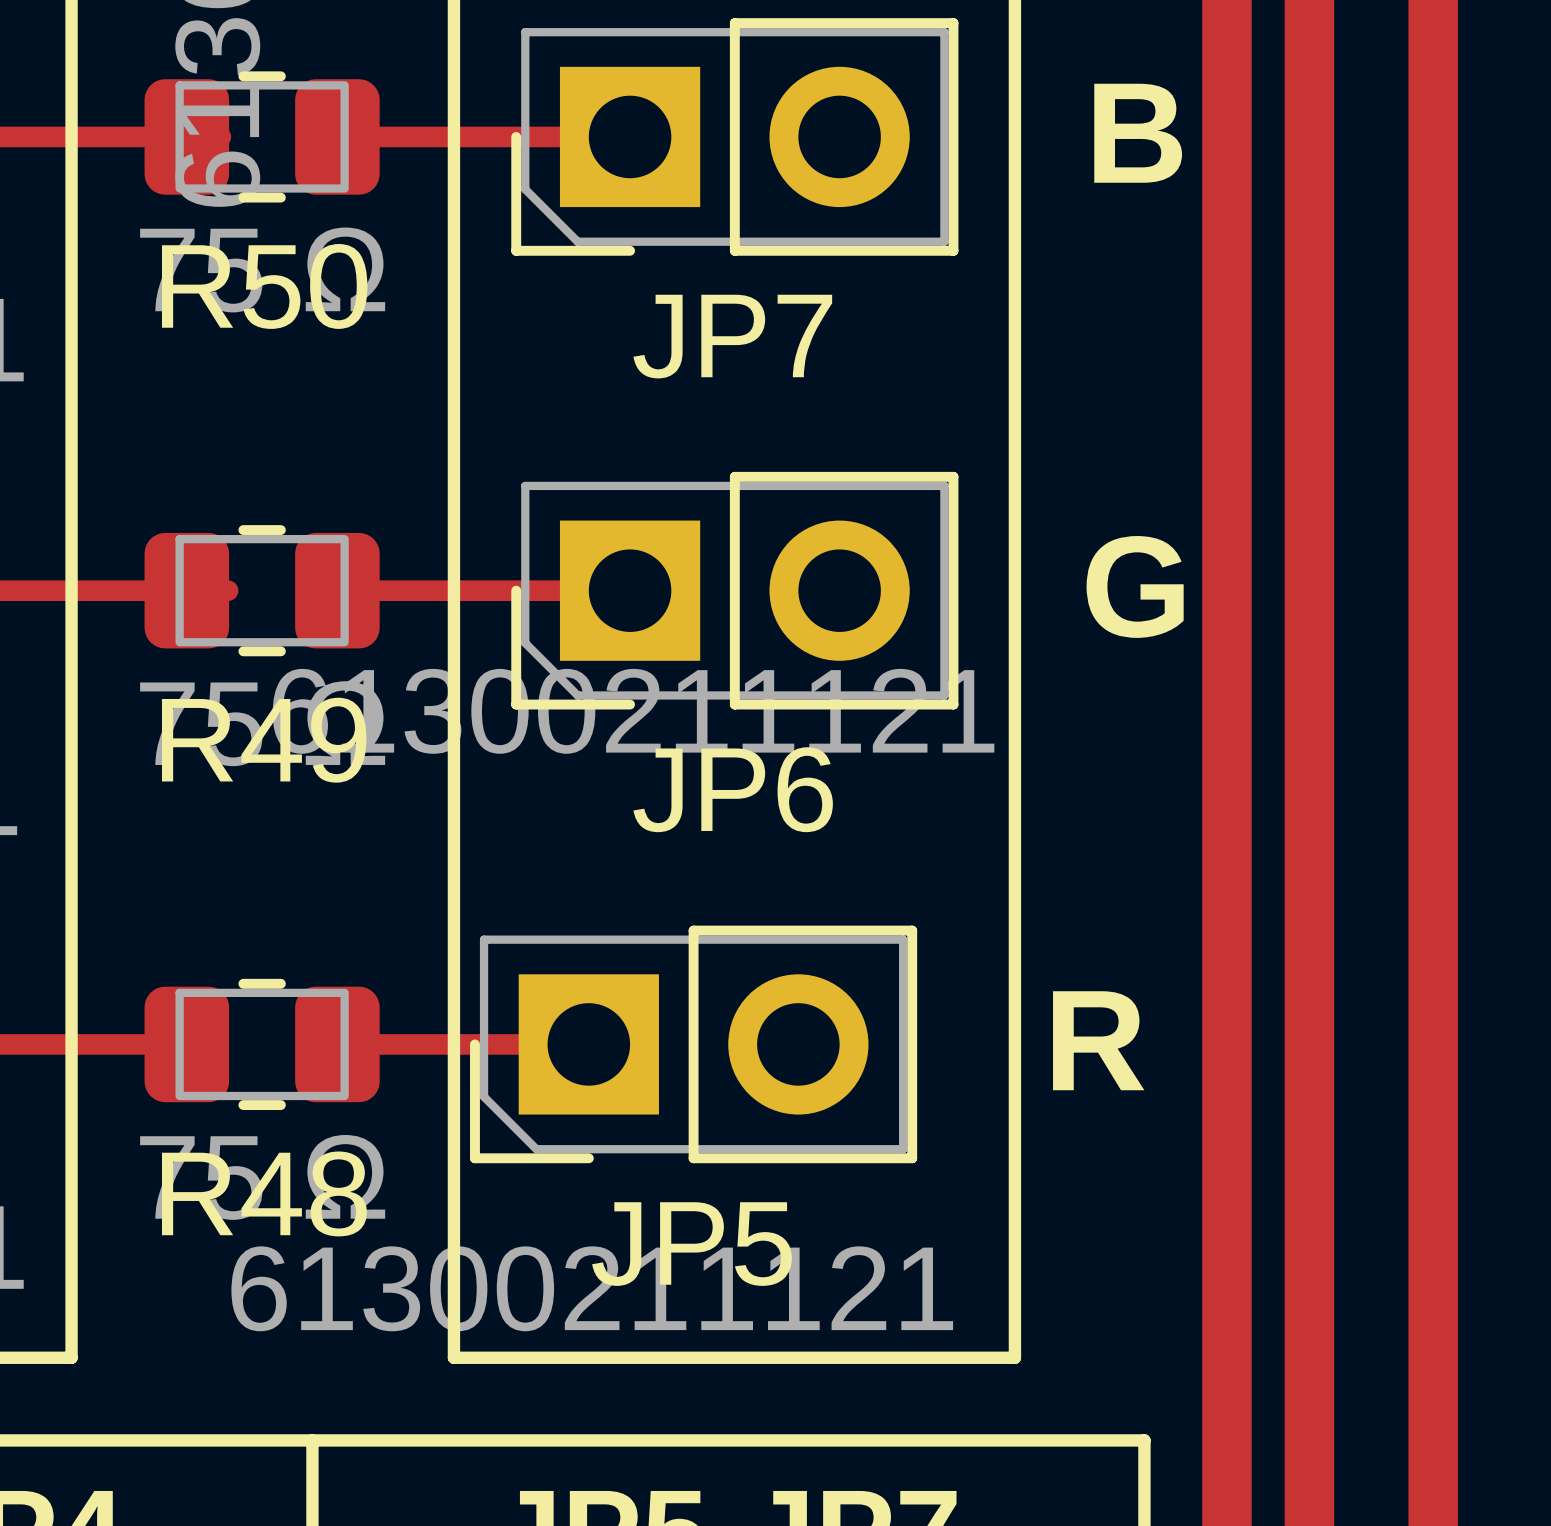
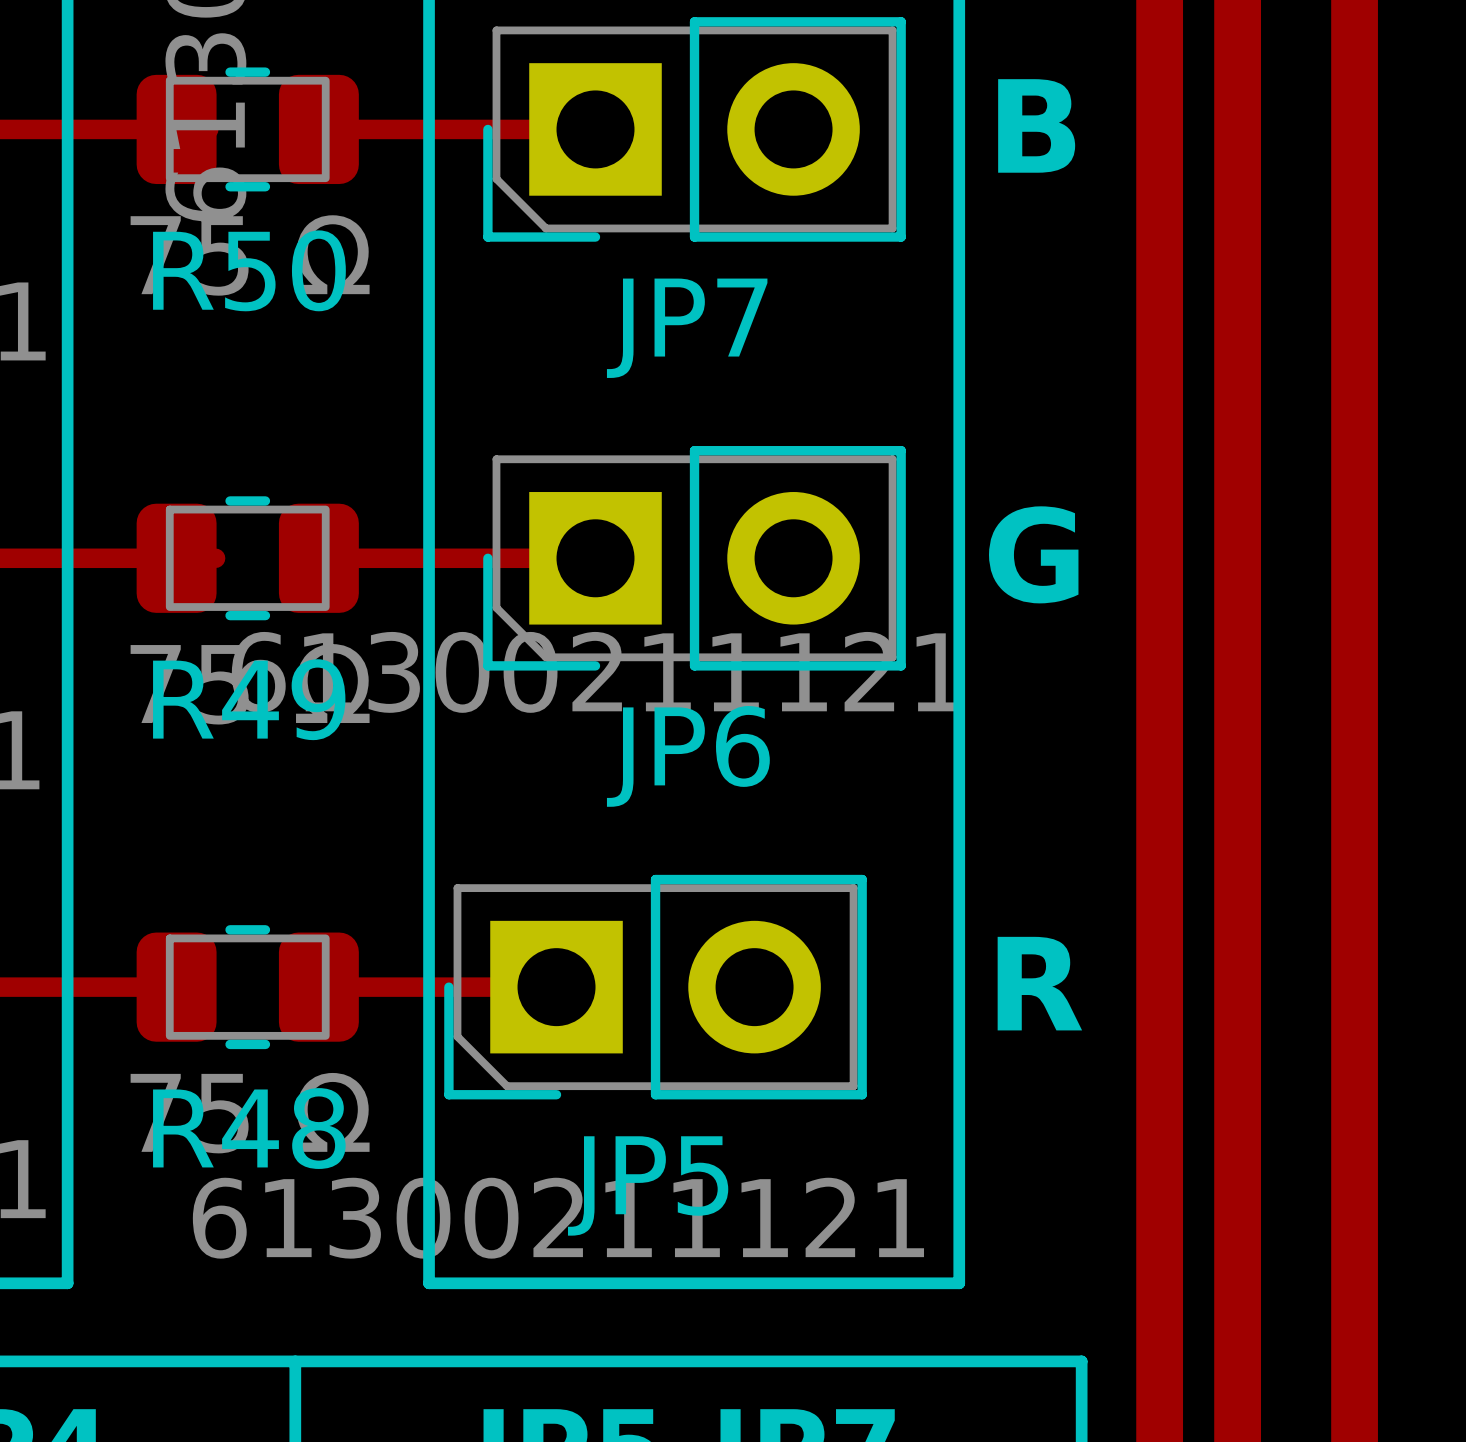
text position: B (1138, 133) -> B (1036, 125)
text position: G (1135, 586) -> G (1033, 554)

